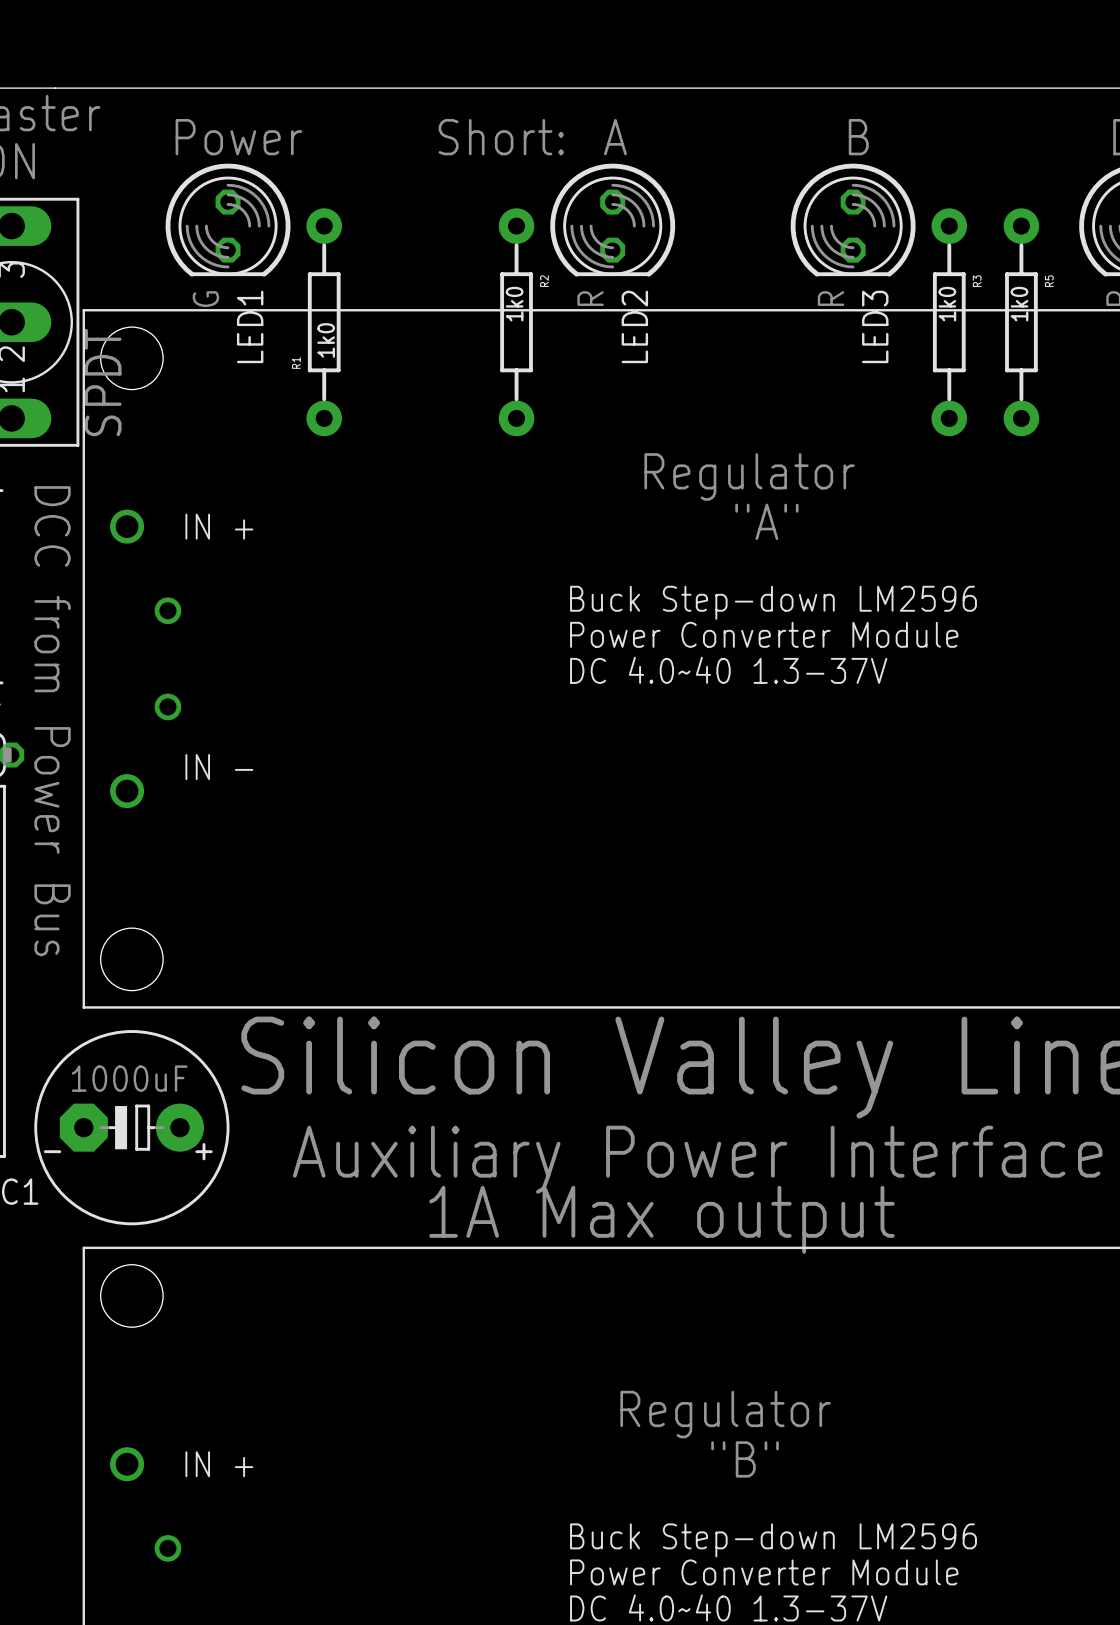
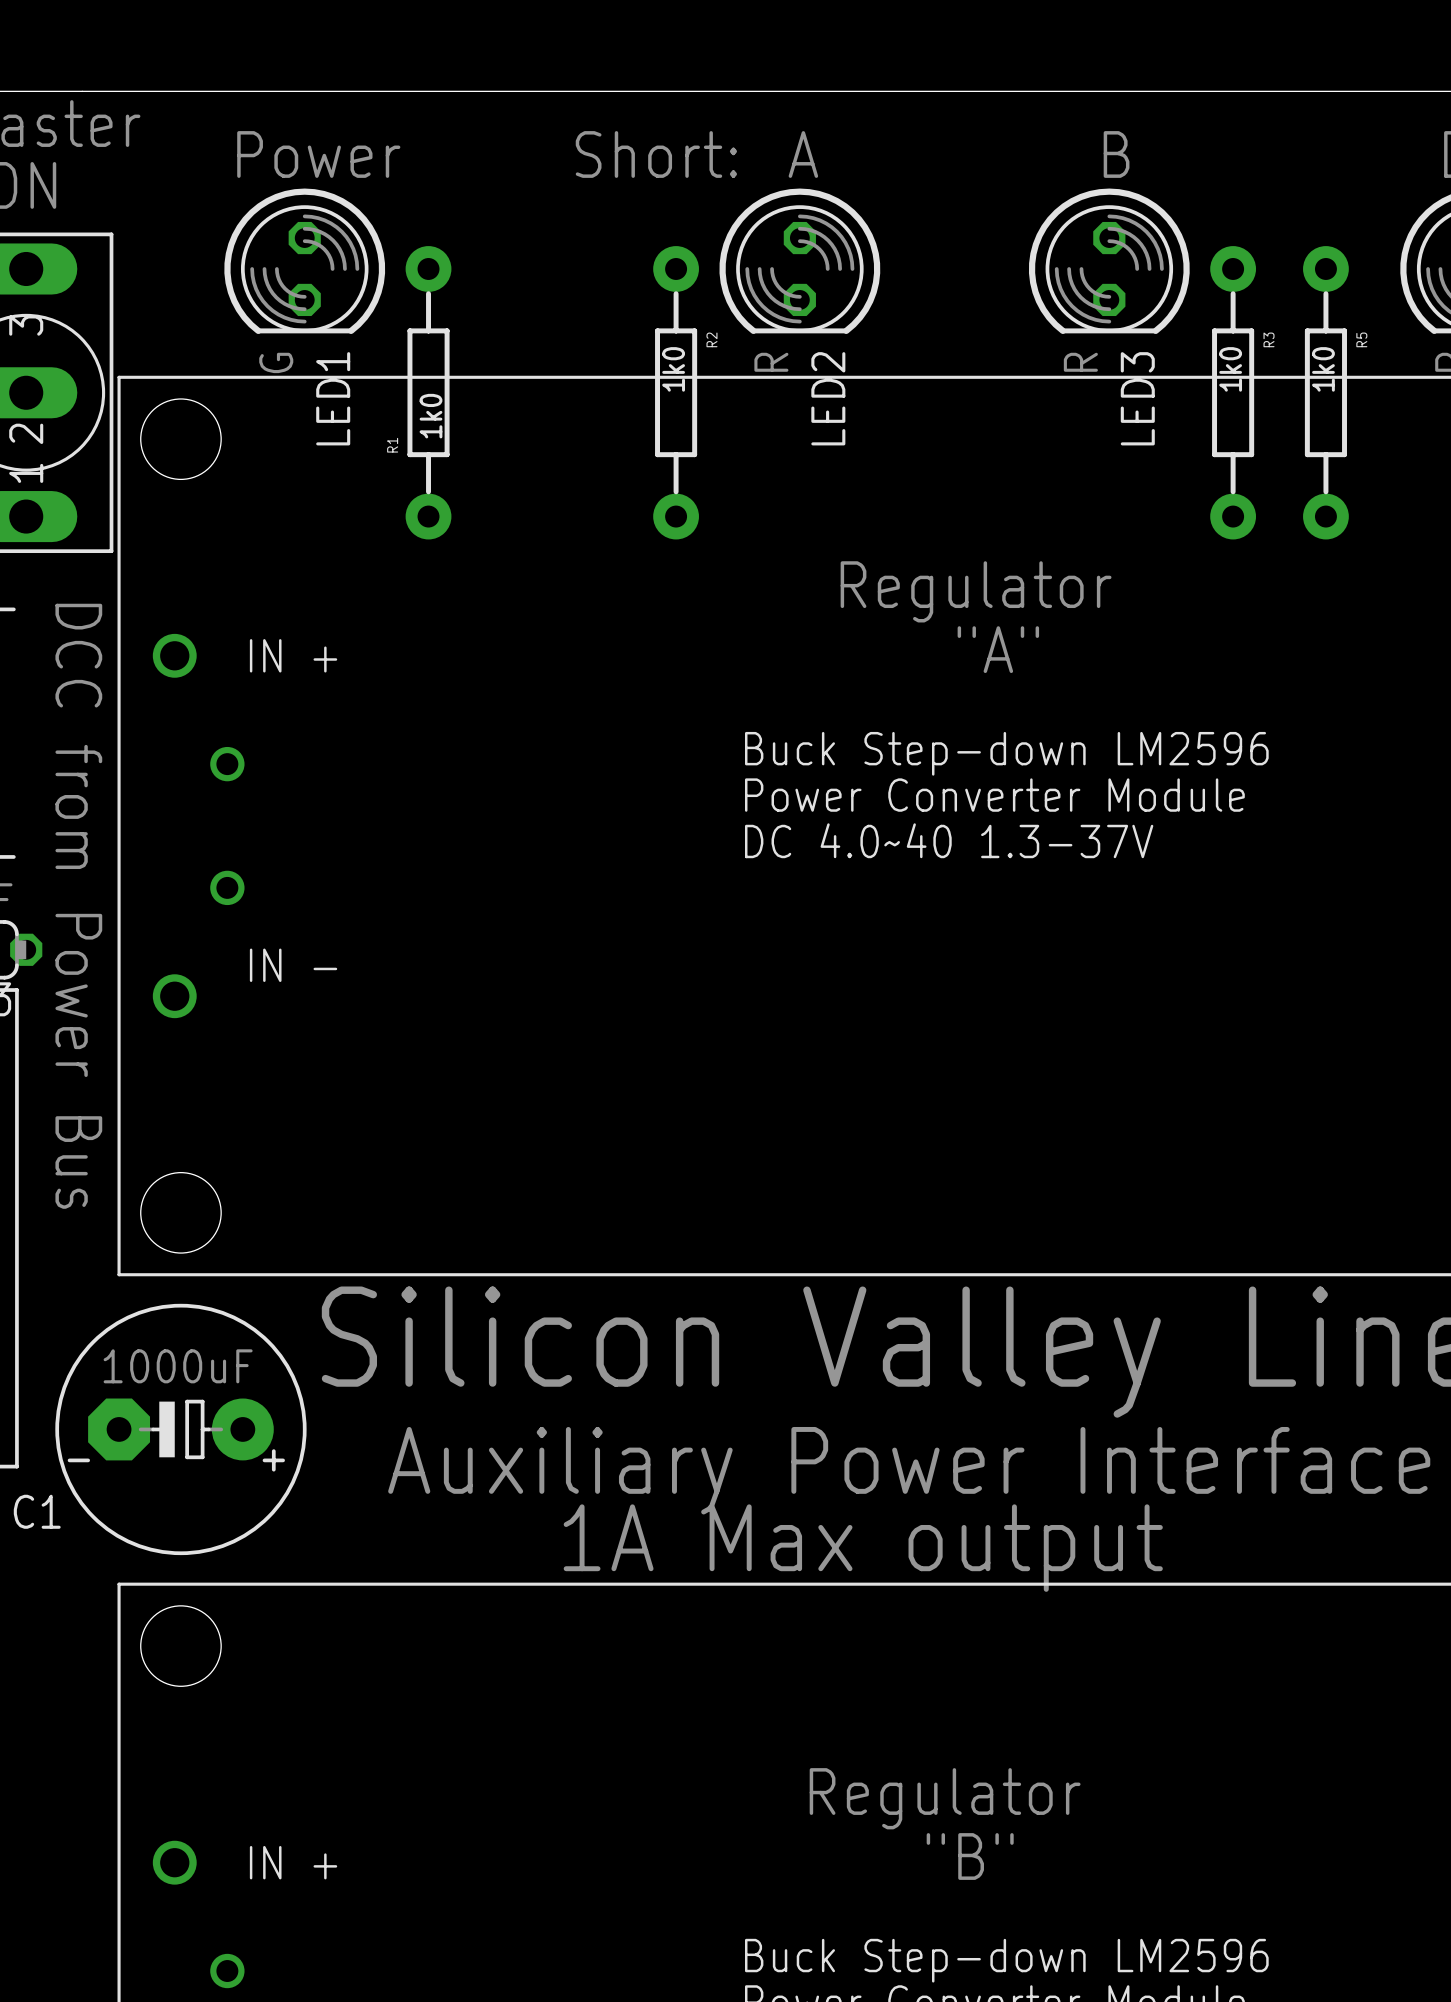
part value: SPDT (103, 382) -> none

